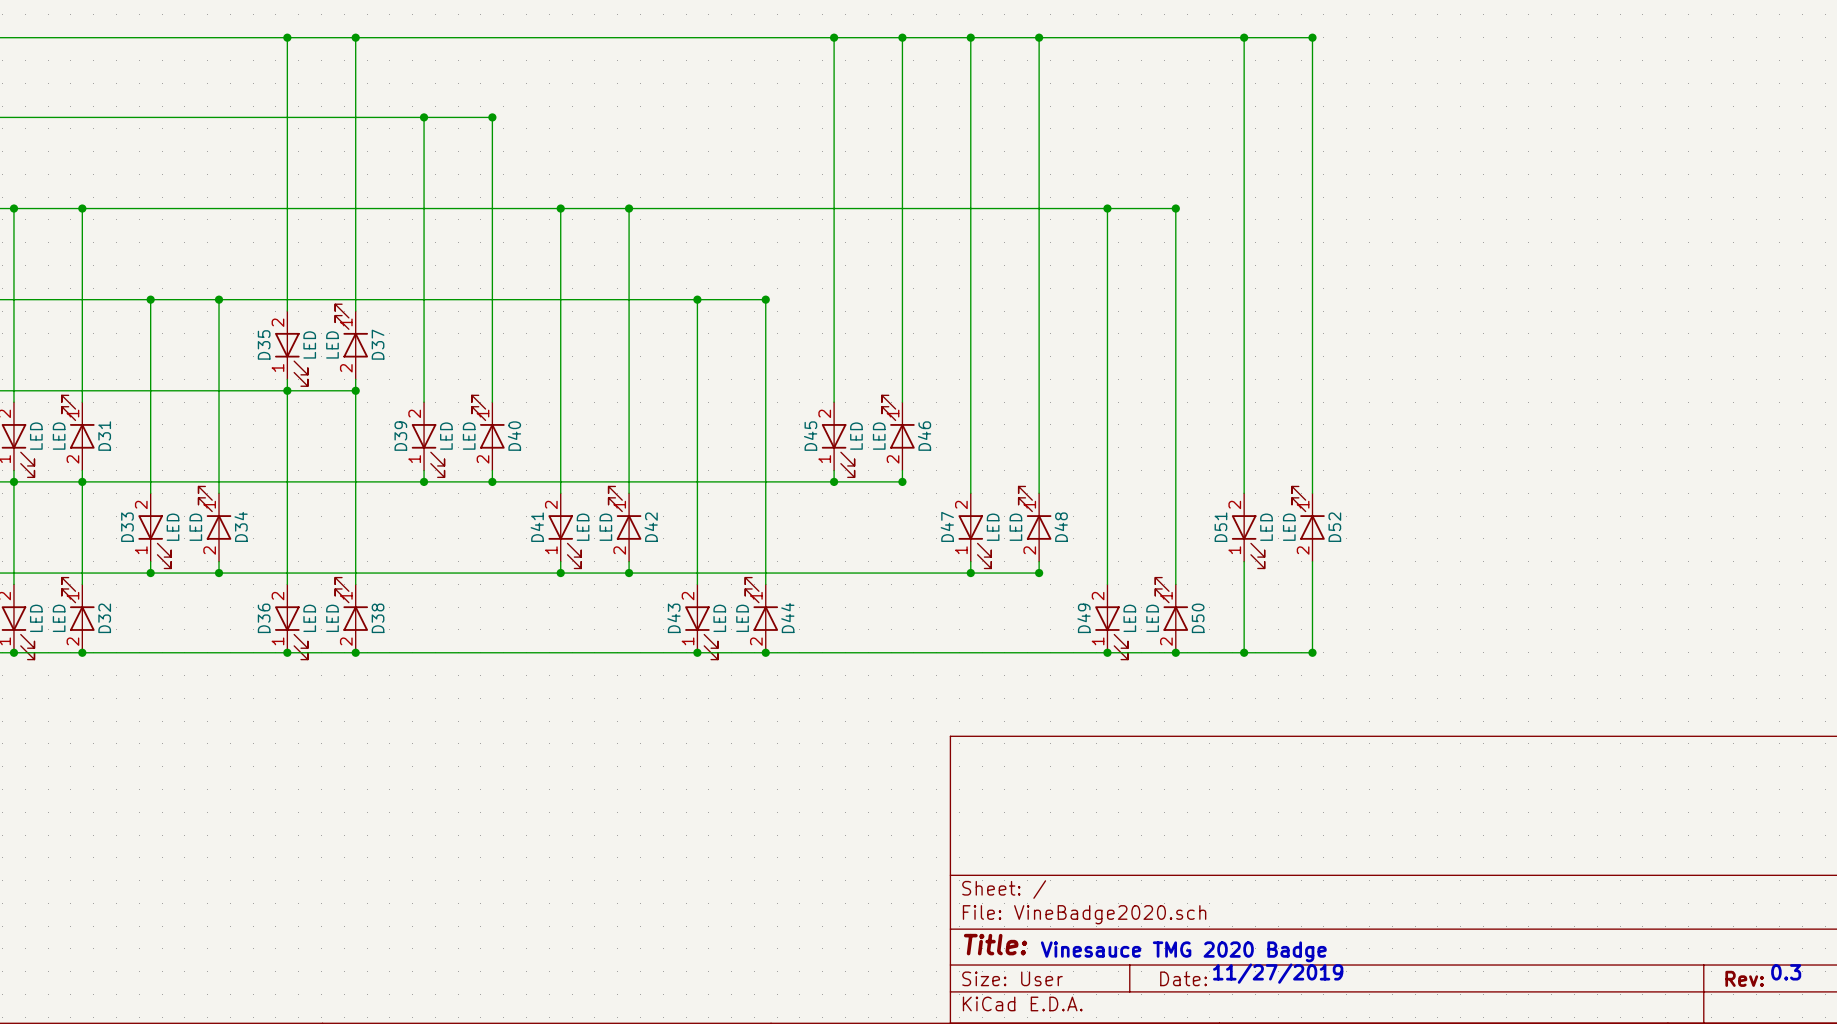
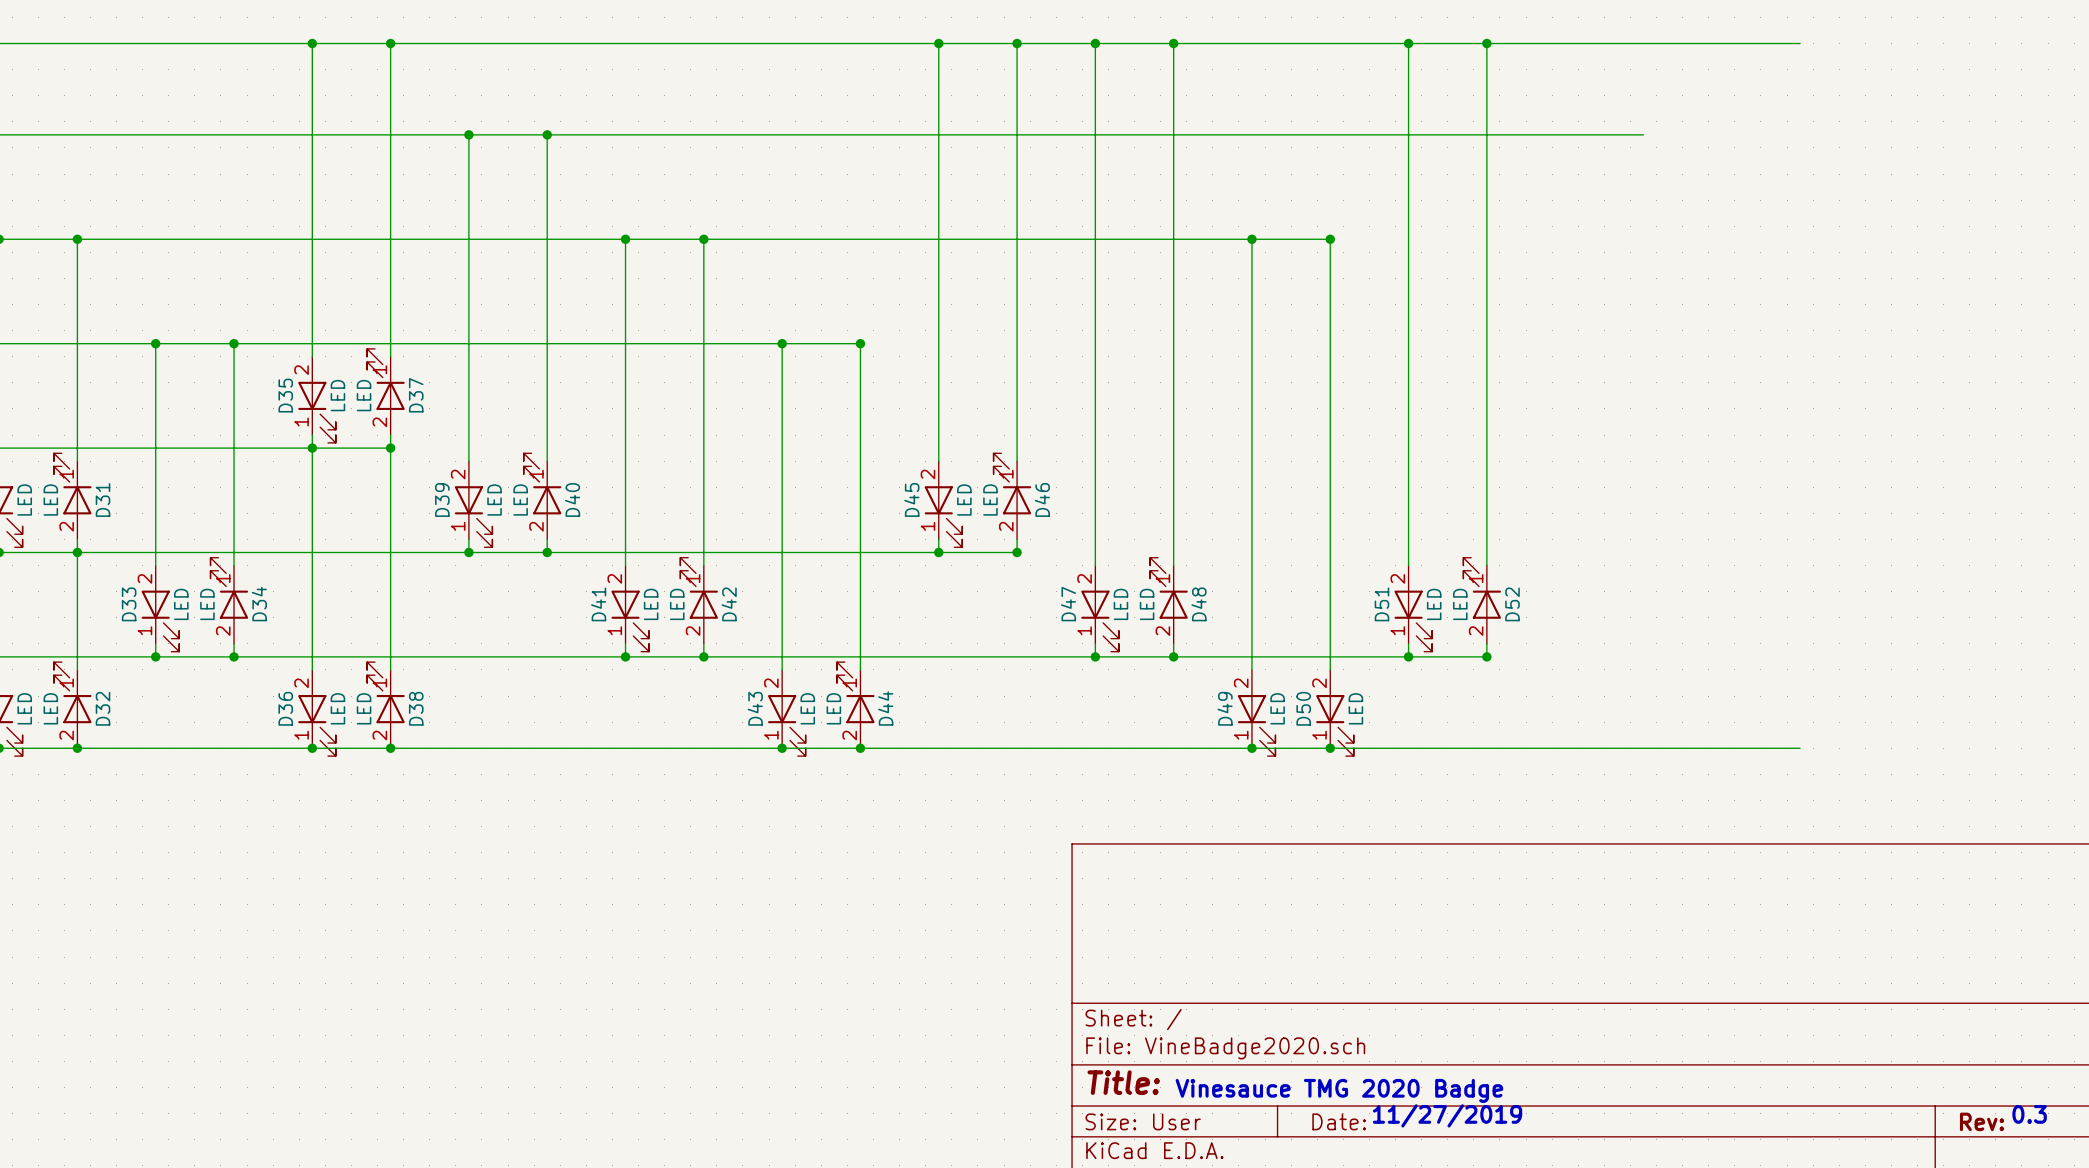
wire: none -> (1486, 43) (1800, 43)
wire: none -> (547, 134) (1643, 134)
wire: (1244, 573) (1244, 652) -> none
junction: none -> (1408, 656)
wire: (1312, 573) (1312, 652) -> (1486, 656) (1173, 656)
junction: none -> (1486, 656)
D50 rotation: 0° (1171, 604) -> 180° (1334, 725)
junction: (1244, 652) -> none
wire: none -> (1486, 748) (1800, 748)
junction: (1312, 652) -> none

